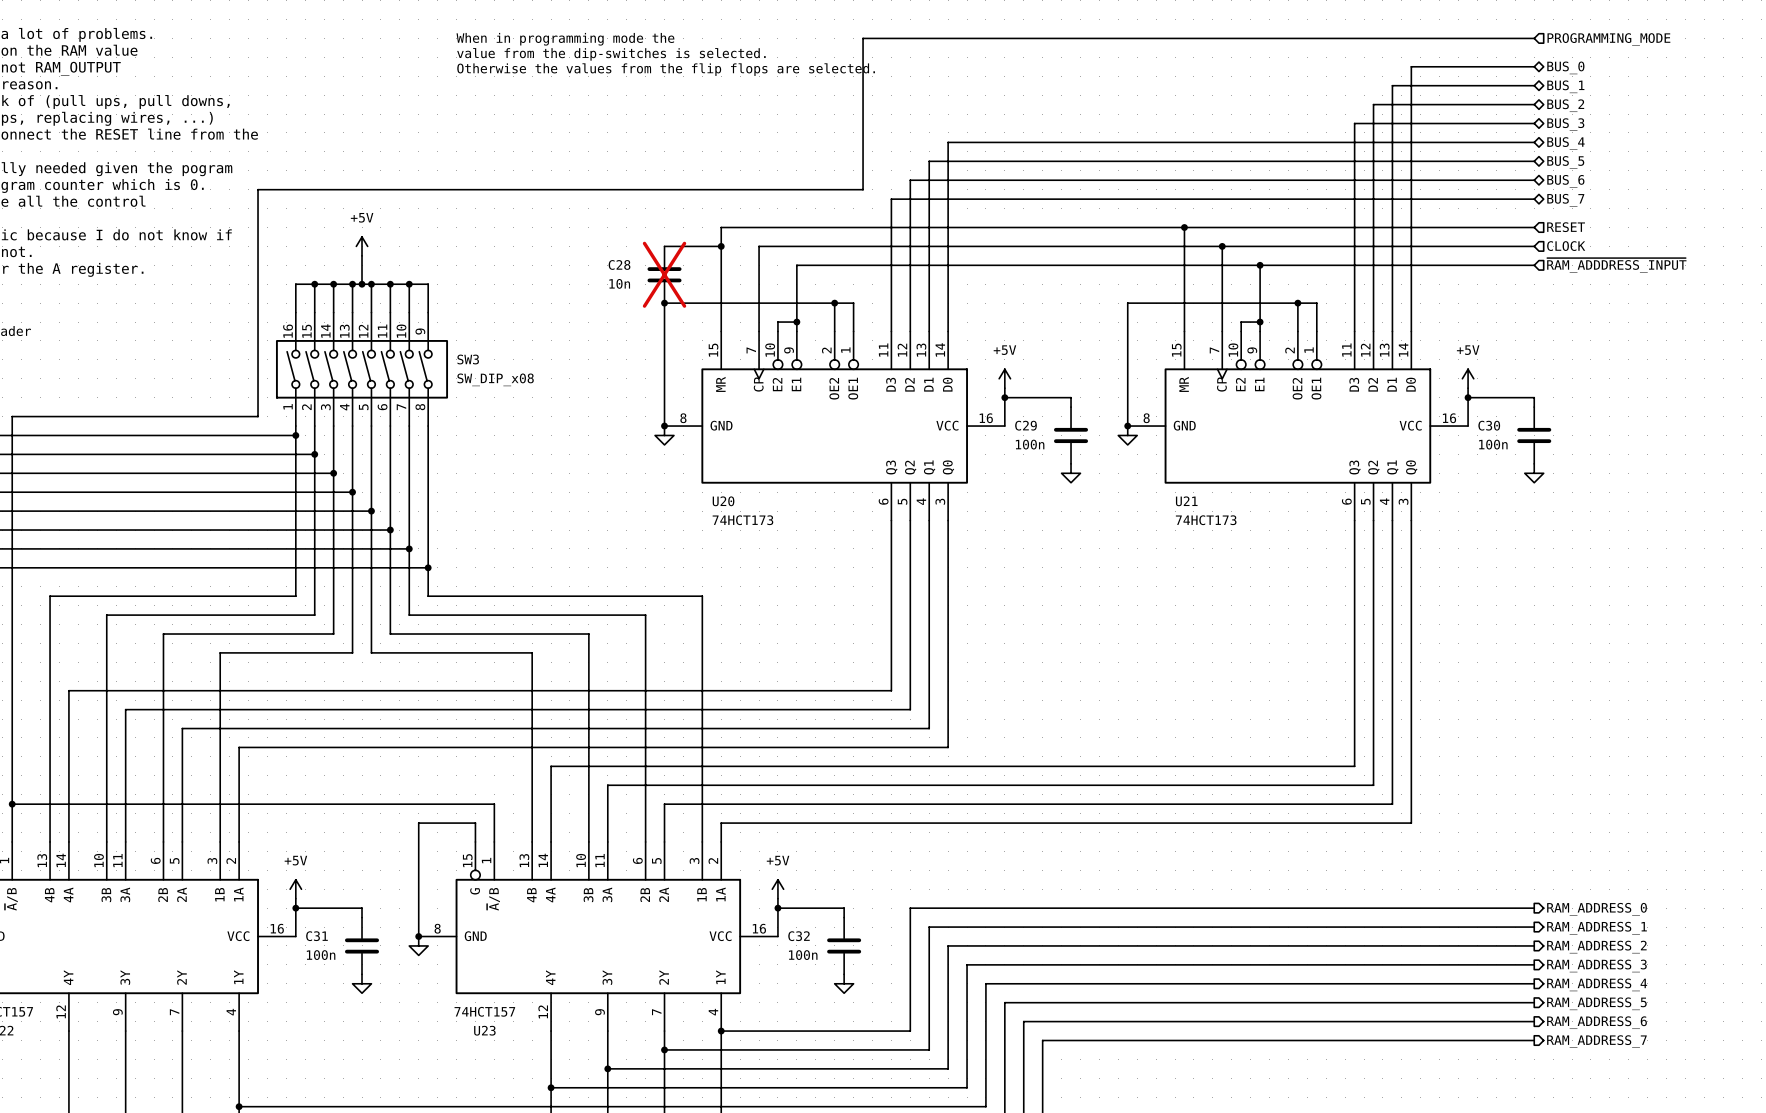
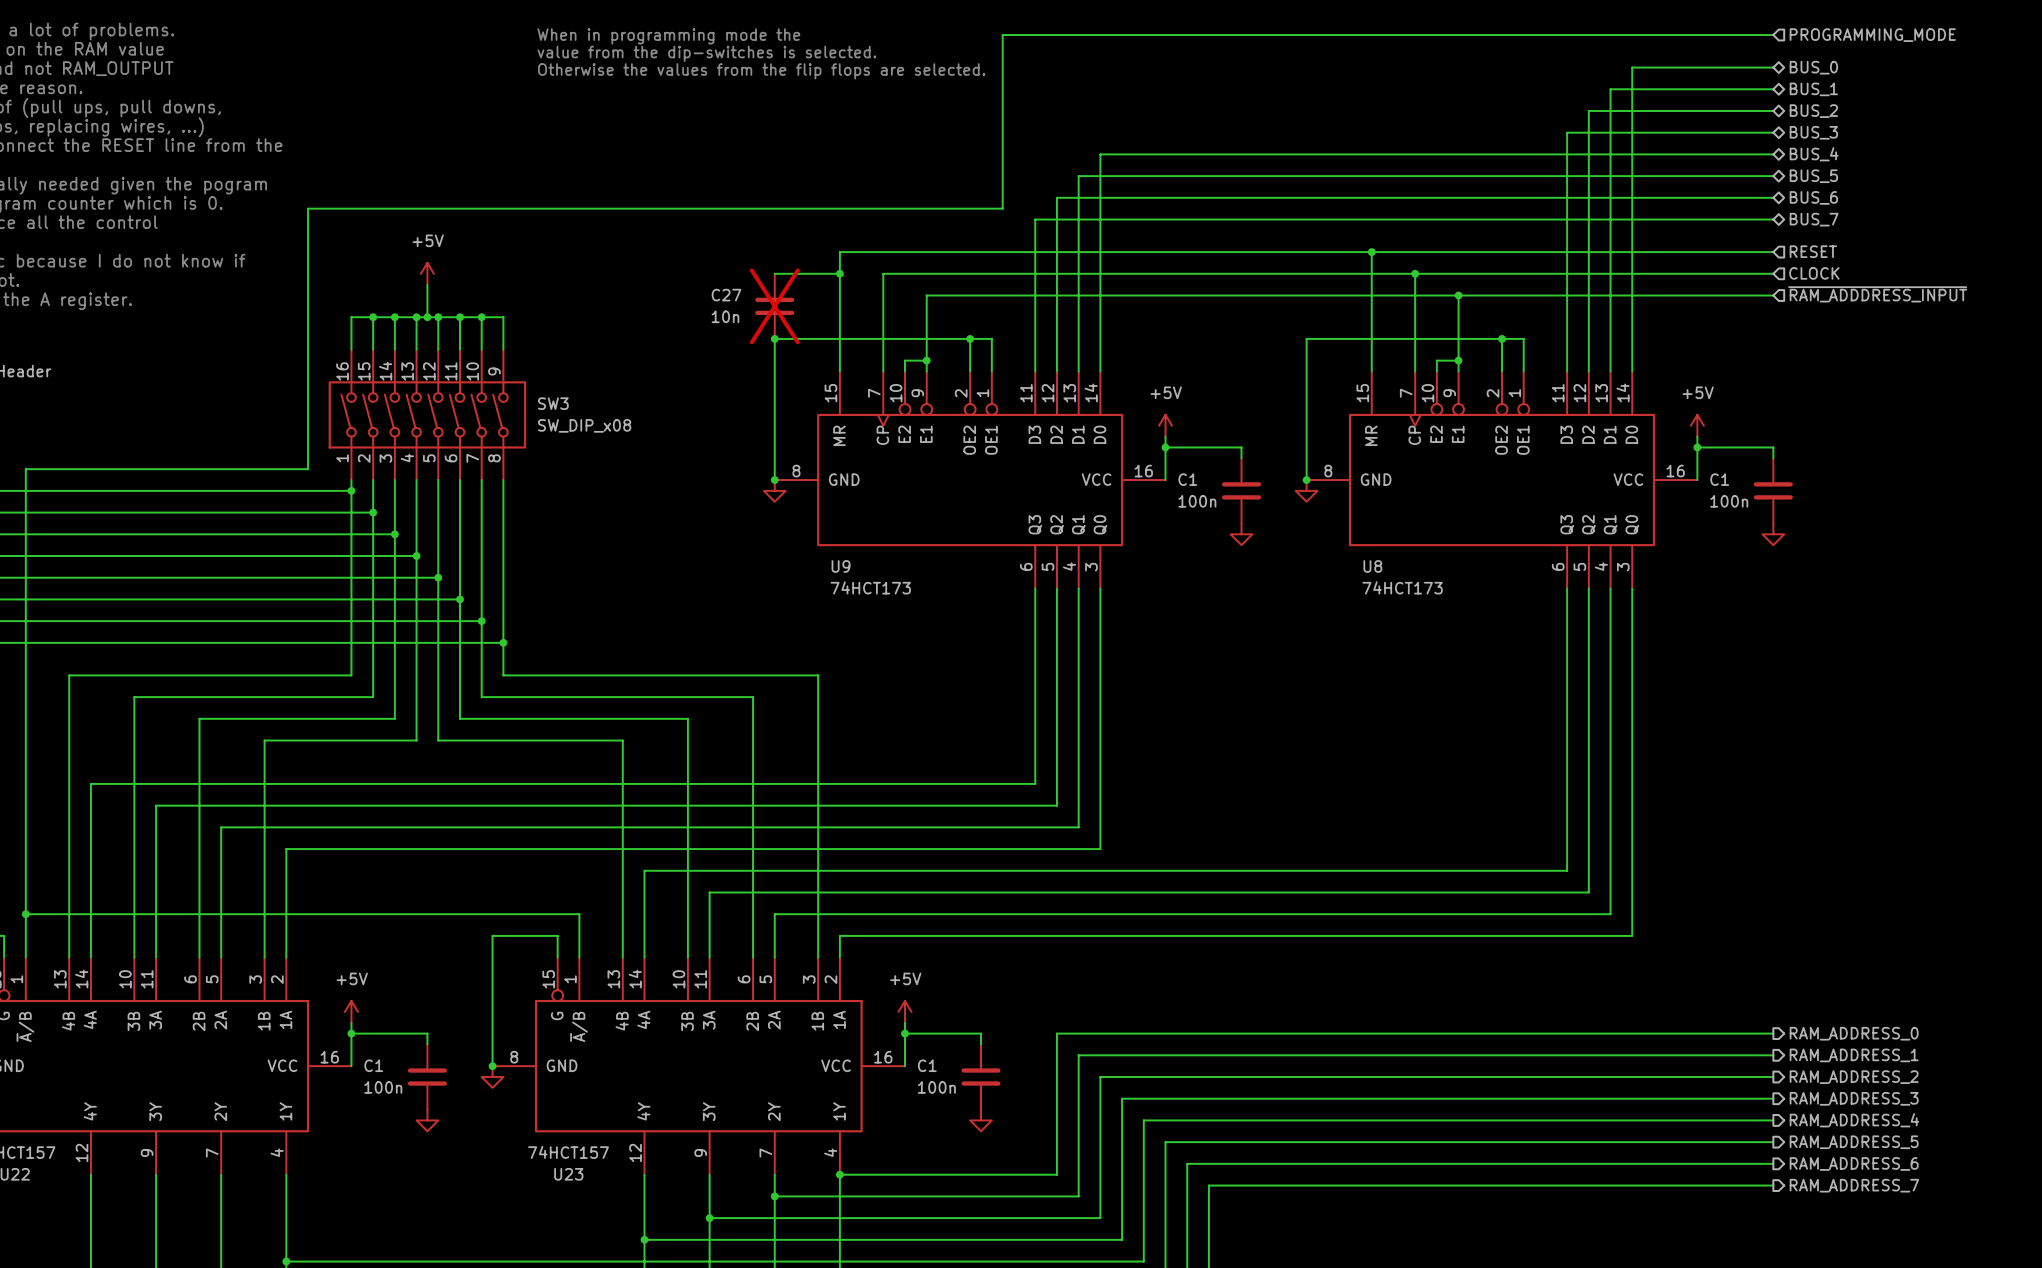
C28 name: C28 (619, 264) -> C27 (726, 295)
C29 name: C29 (1026, 425) -> C1 (1187, 479)
C30 name: C30 (1489, 425) -> C1 (1719, 479)
U20 name: U20 (723, 501) -> U9 (841, 566)
U21 name: U21 (1186, 501) -> U8 (1372, 566)
C31 name: C31 (316, 936) -> C1 (373, 1065)
C32 name: C32 (799, 936) -> C1 (927, 1065)

